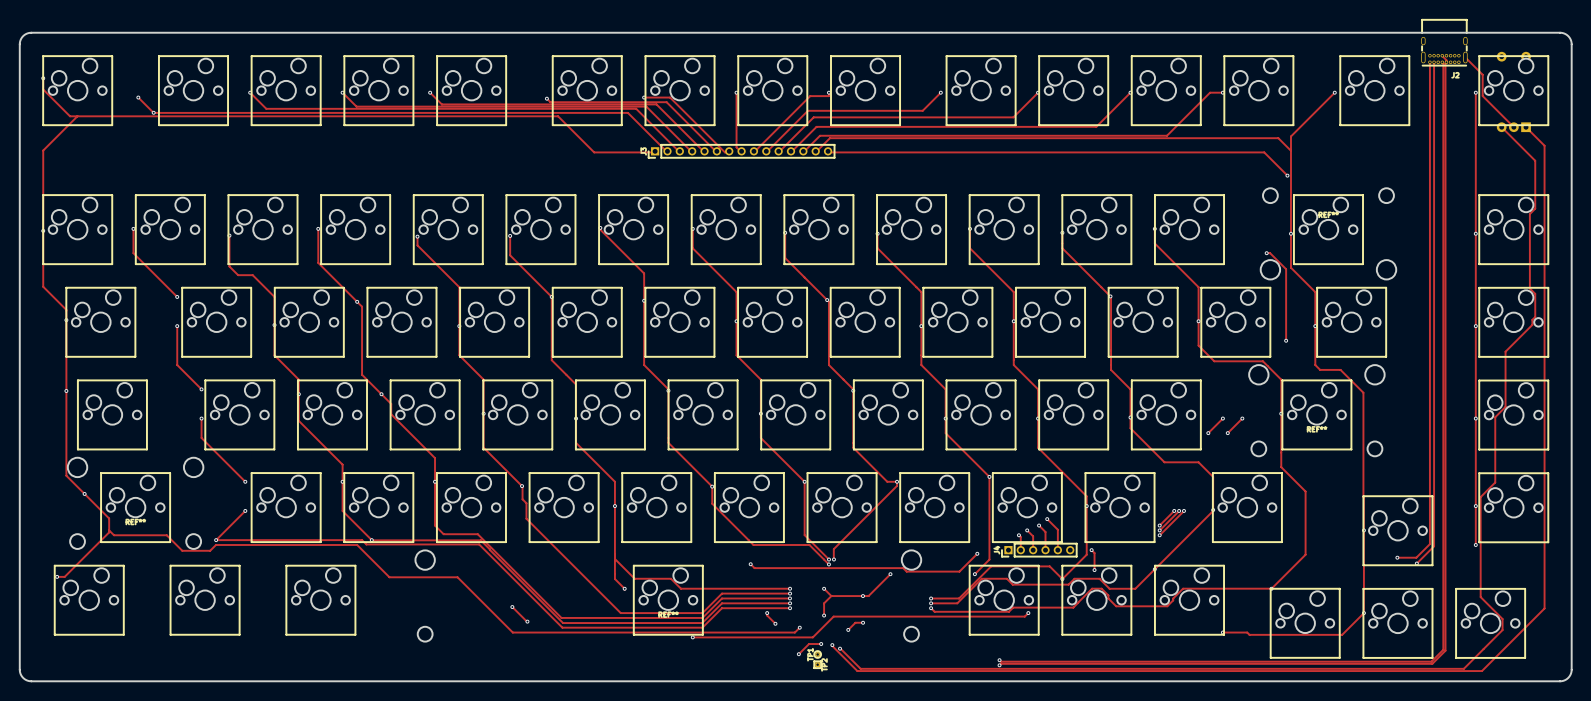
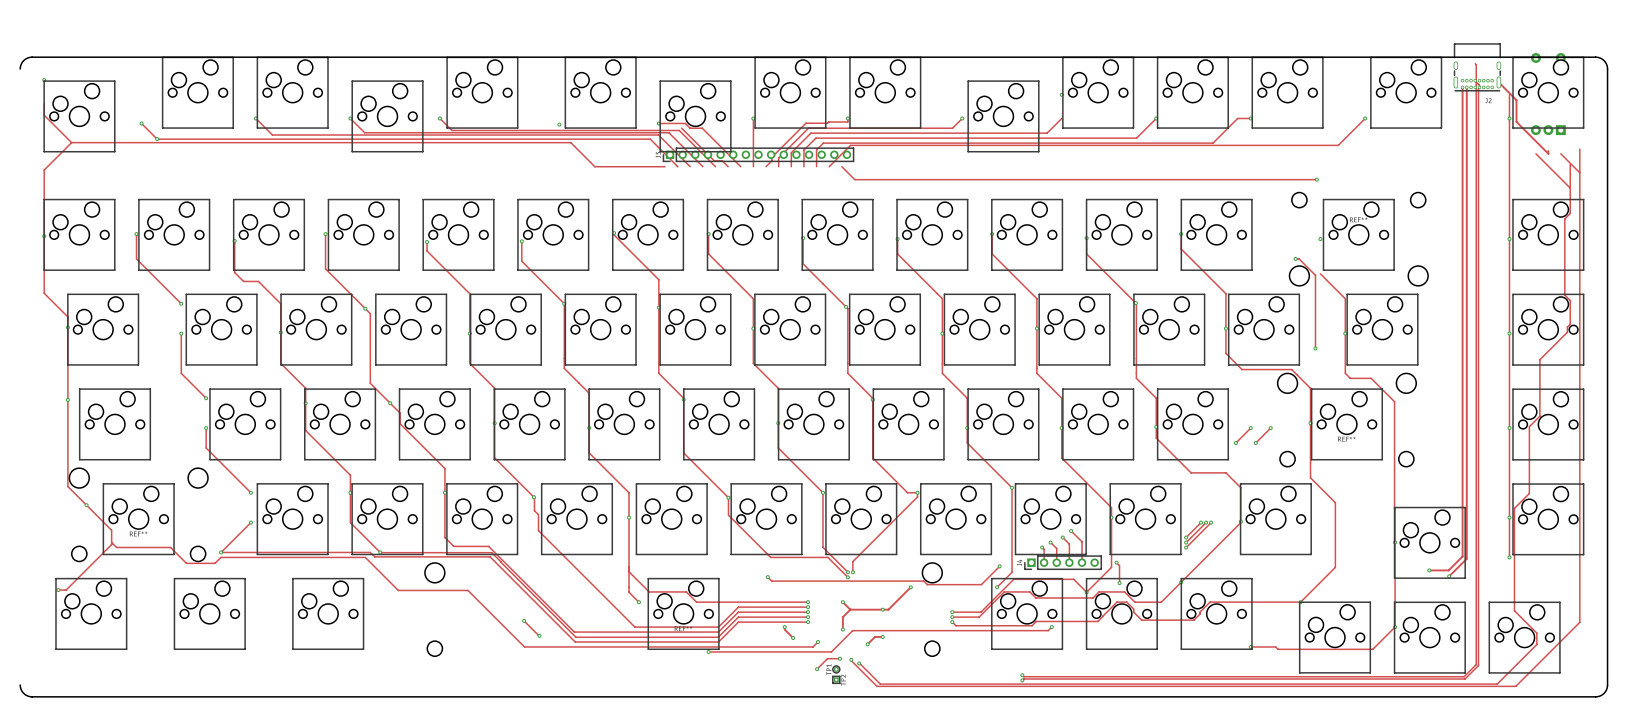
part position: (1444, 42) -> (1477, 67)
track: (1442, 55) (1446, 60) (1445, 86) -> (1475, 80) (1479, 85) (1478, 88)
track: (1465, 57) (1482, 74) (1482, 96) (1513, 127) (1513, 124) -> (1498, 82) (1516, 100) (1516, 121) (1548, 153) (1548, 151)
track: (1429, 62) (1429, 85) -> none
track: (1434, 62) (1434, 85) -> none
board edge: (1571, 67) (1571, 41) (1567, 35) (1560, 32) (26, 33) (21, 38) (19, 44) (19, 669) -> (1607, 69) (1604, 60) (1595, 57) (32, 57) (23, 60) (20, 69)
track: (43, 78) (43, 89) (70, 116) (558, 116) (594, 152) (655, 152) -> none
part position: (77, 90) -> (79, 116)
part position: (378, 90) -> (387, 116)
part position: (680, 90) -> (695, 116)
part position: (981, 90) -> (1003, 116)
track: (250, 92) (266, 108) (636, 108) (679, 152) -> none
via position: (250, 92) -> (255, 118)
track: (342, 92) (356, 106) (646, 106) (692, 152) -> none
via position: (342, 92) -> (350, 118)
track: (430, 92) (441, 104) (656, 104) (704, 152) -> none
via position: (430, 92) -> (439, 118)
track: (736, 92) (736, 147) (741, 152) -> none
via position: (736, 92) -> (753, 118)
track: (828, 92) (828, 96) (810, 96) (753, 152) -> none
via position: (828, 92) -> (847, 118)
track: (940, 92) (922, 110) (807, 110) (766, 152) -> none
via position: (940, 92) -> (962, 118)
track: (1038, 92) (1013, 117) (813, 117) (778, 152) -> none
track: (1130, 92) (1096, 126) (816, 126) (791, 152) -> none
via position: (1130, 92) -> (1156, 118)
track: (1222, 92) (1210, 92) (1166, 135) (820, 135) (803, 152) -> none
via position: (1222, 92) -> (1250, 118)
track: (1334, 92) (1290, 136) (1290, 267) -> none
via position: (1334, 92) -> (1365, 118)
via position: (1475, 92) -> (1509, 118)
track: (138, 97) (153, 112) (627, 112) (667, 152) -> none
via: (138, 97) -> none
track: (644, 97) (670, 97) (724, 152) (729, 152) -> none
via position: (644, 97) -> (658, 123)
track: (546, 98) (550, 102) (666, 102) (716, 152) -> none
via position: (546, 98) -> (559, 124)
track: none -> (44, 103) (44, 115) (71, 142)
via: (153, 112) -> none
track: none -> (255, 118) (272, 135) (658, 135) (690, 166)
track: none -> (350, 118) (364, 132) (668, 132) (702, 166)
track: none -> (439, 118) (451, 130) (679, 130) (715, 166)
track: none -> (753, 118) (753, 166)
track: none -> (847, 118) (847, 122) (805, 123) (771, 157) (771, 160) (766, 166)
track: none -> (962, 118) (952, 128) (808, 128) (778, 158) (778, 166)
track: none -> (1061, 118) (1047, 133) (810, 133) (791, 152) (791, 166)
track: none -> (1156, 118) (1136, 138) (815, 138) (803, 150) (803, 166)
track: none -> (1250, 118) (1237, 118) (1213, 143) (823, 143) (816, 149) (816, 166)
track: none -> (1365, 118) (1338, 145) (850, 145) (829, 166)
track: (77, 116) (43, 150) (43, 166) -> (71, 142) (44, 170)
track: none -> (141, 123) (157, 139) (650, 139) (677, 166)
via: none -> (141, 123)
track: none -> (658, 123) (685, 123) (690, 128) (702, 128) (740, 166)
track: none -> (681, 128) (714, 160) (722, 160) (728, 166)
track: (1501, 127) (1535, 160) -> (1535, 153) (1570, 188)
track: (1526, 127) (1544, 145) -> (1560, 153) (1579, 172)
via: none -> (157, 139)
track: none -> (71, 142) (570, 142) (594, 166) (664, 166)
track: (1290, 150) (1278, 138) (829, 138) (815, 152) -> none
track: (828, 152) (1264, 152) (1287, 175) -> (841, 166) (854, 179) (1316, 179)

